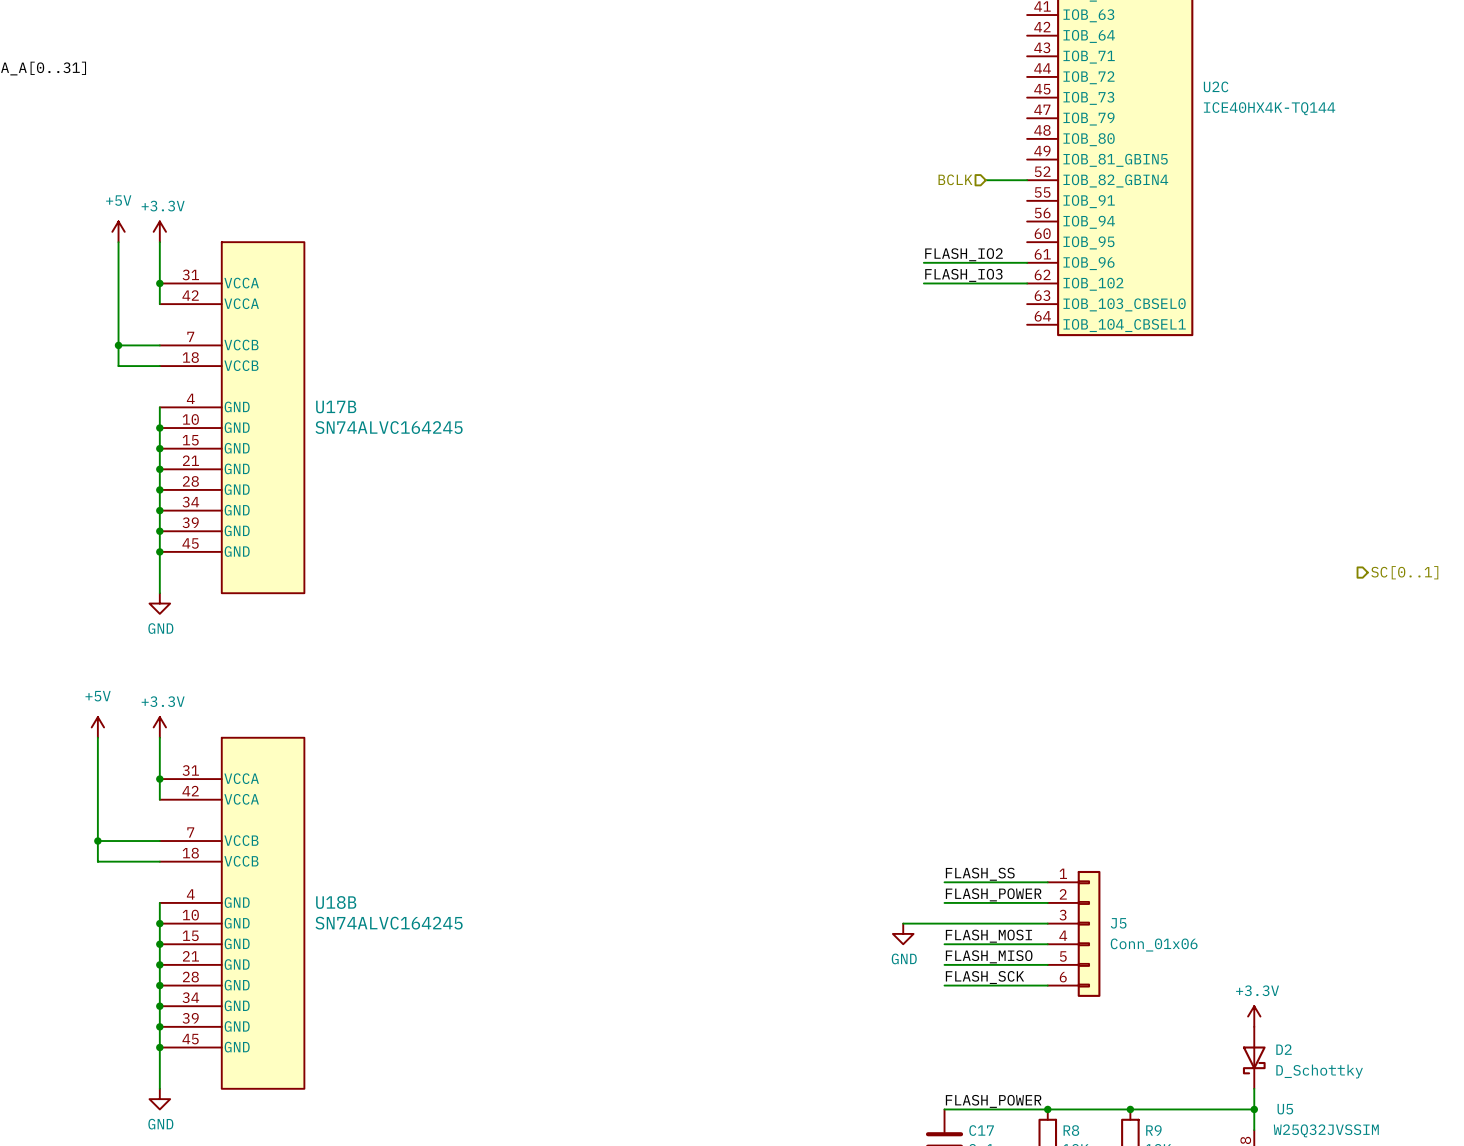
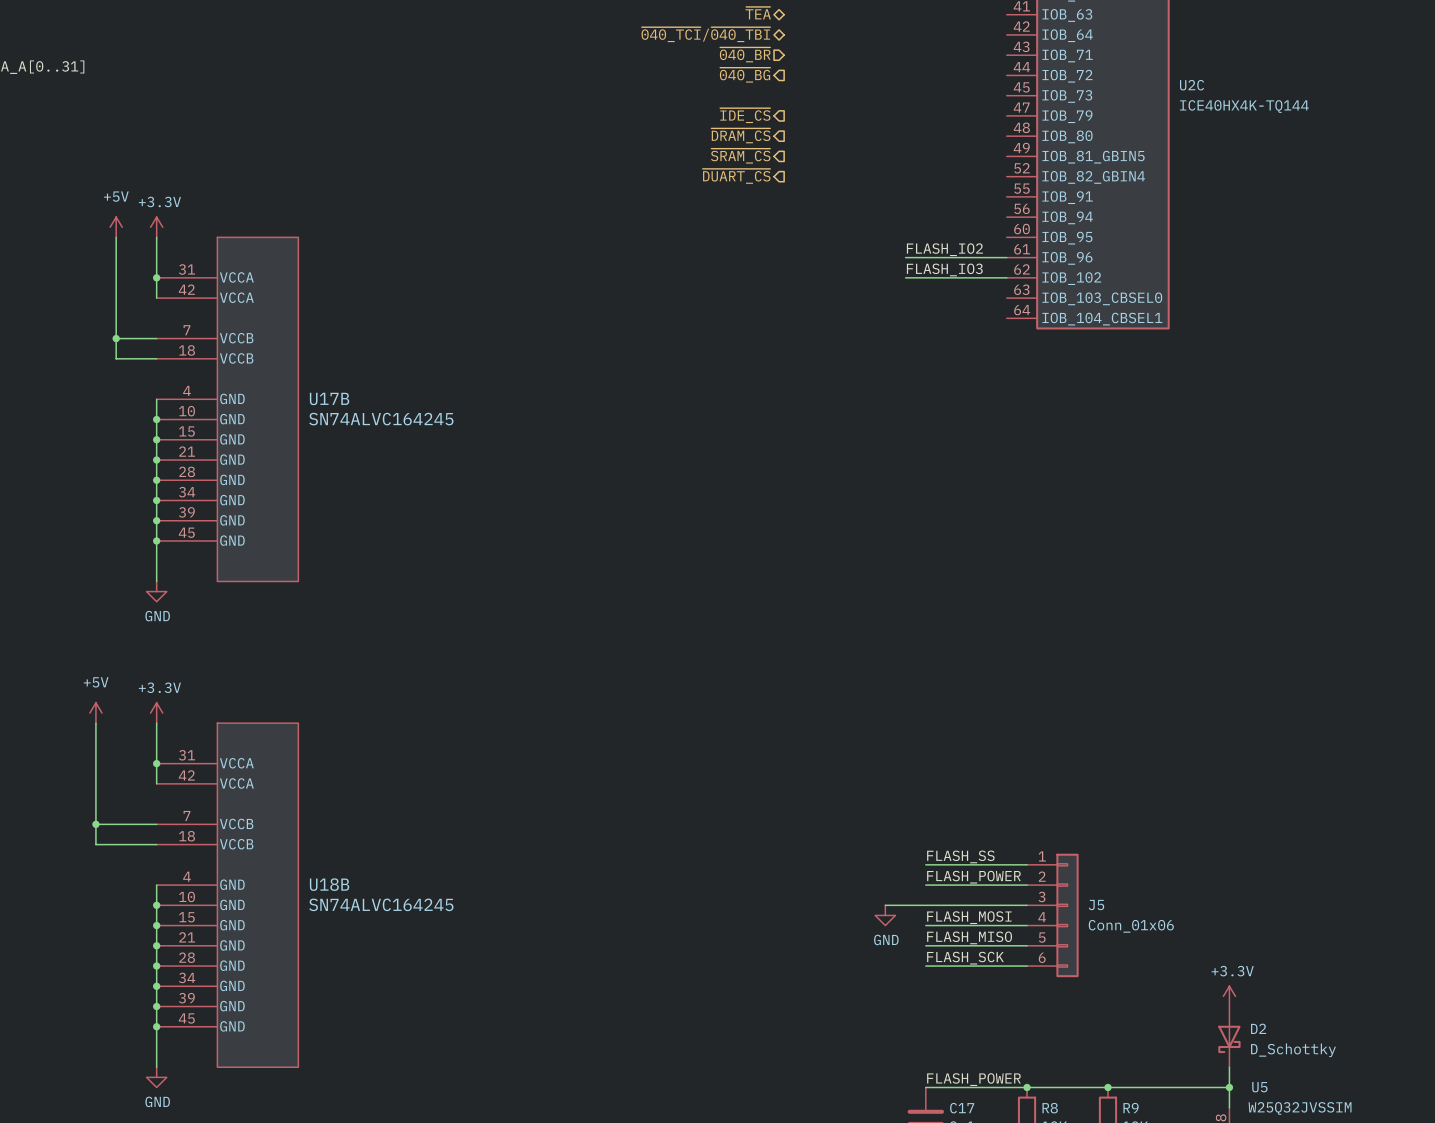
hierarchical label: none -> ~{TEA} (758, 13)
hierarchical label: none -> ~{040_TCI}/~{040_TBI} (705, 34)
hierarchical label: none -> ~{040_BR} (745, 54)
hierarchical label: none -> ~{040_BG} (745, 75)
hierarchical label: none -> ~{IDE_CS} (745, 115)
hierarchical label: none -> ~{DRAM_CS} (740, 135)
hierarchical label: none -> ~{SRAM_CS} (740, 156)
hierarchical label: none -> ~{DUART_CS} (736, 176)
hierarchical label: BCLK (955, 179) -> none
wire: (985, 180) (1027, 180) -> none
hierarchical label: SC[0..1] (1404, 572) -> none

